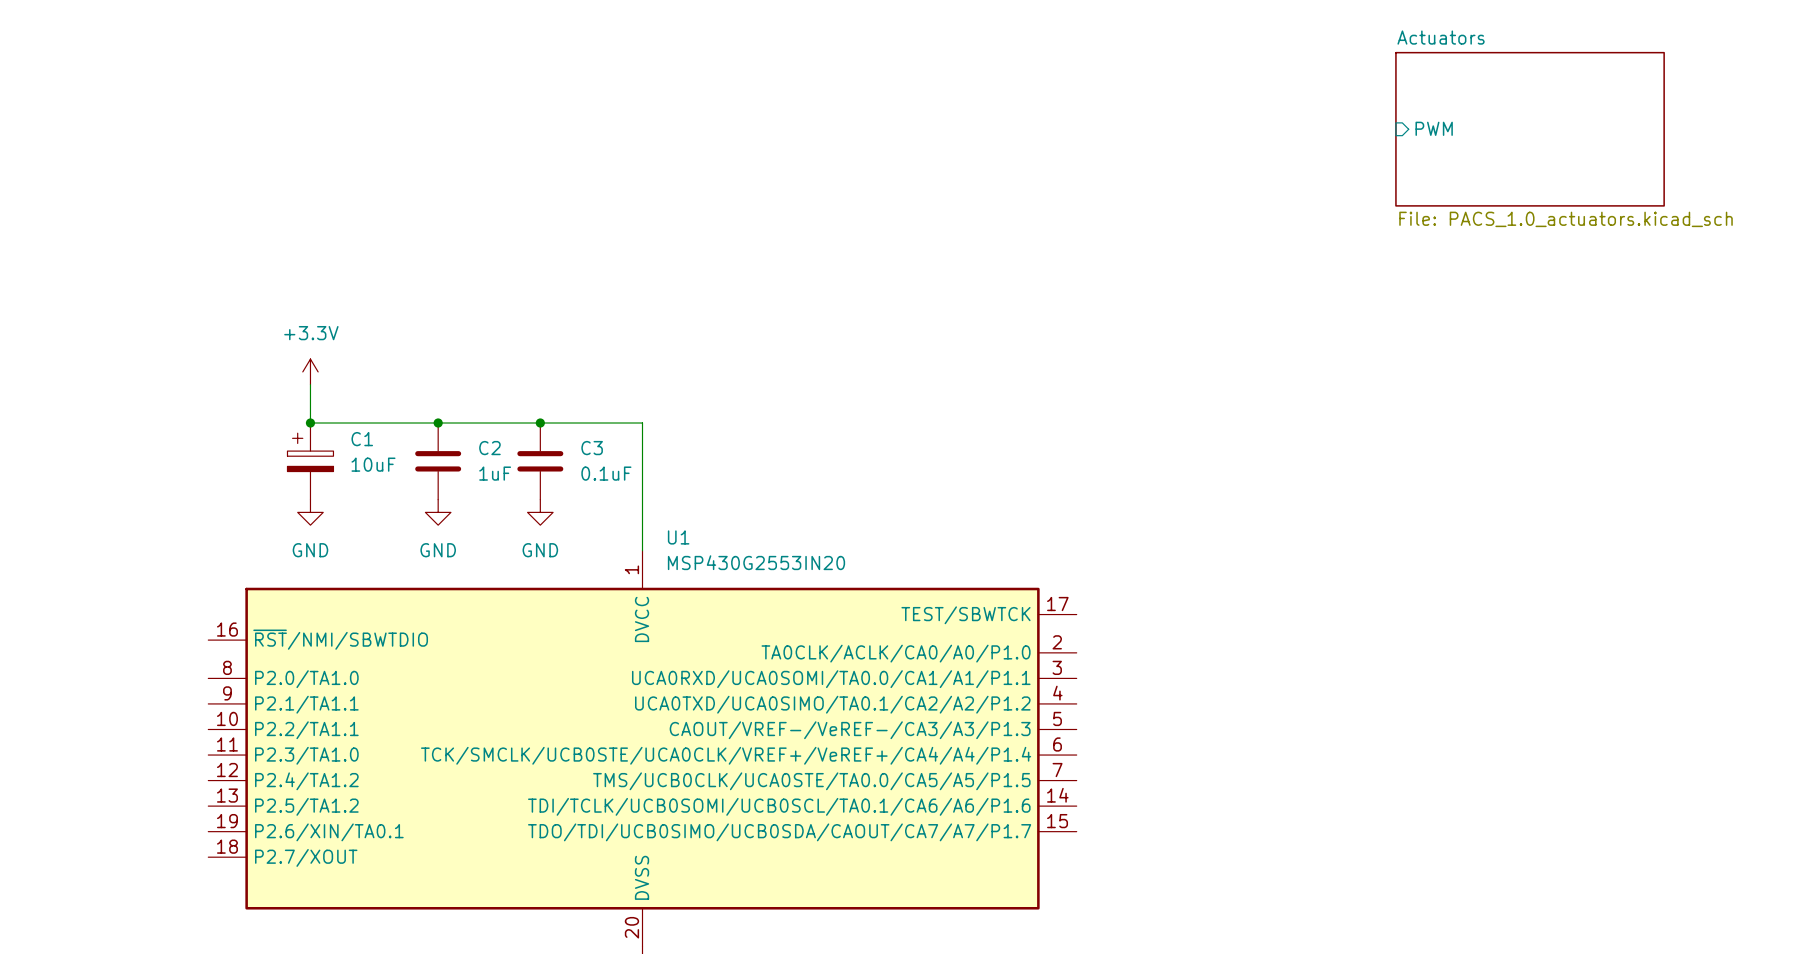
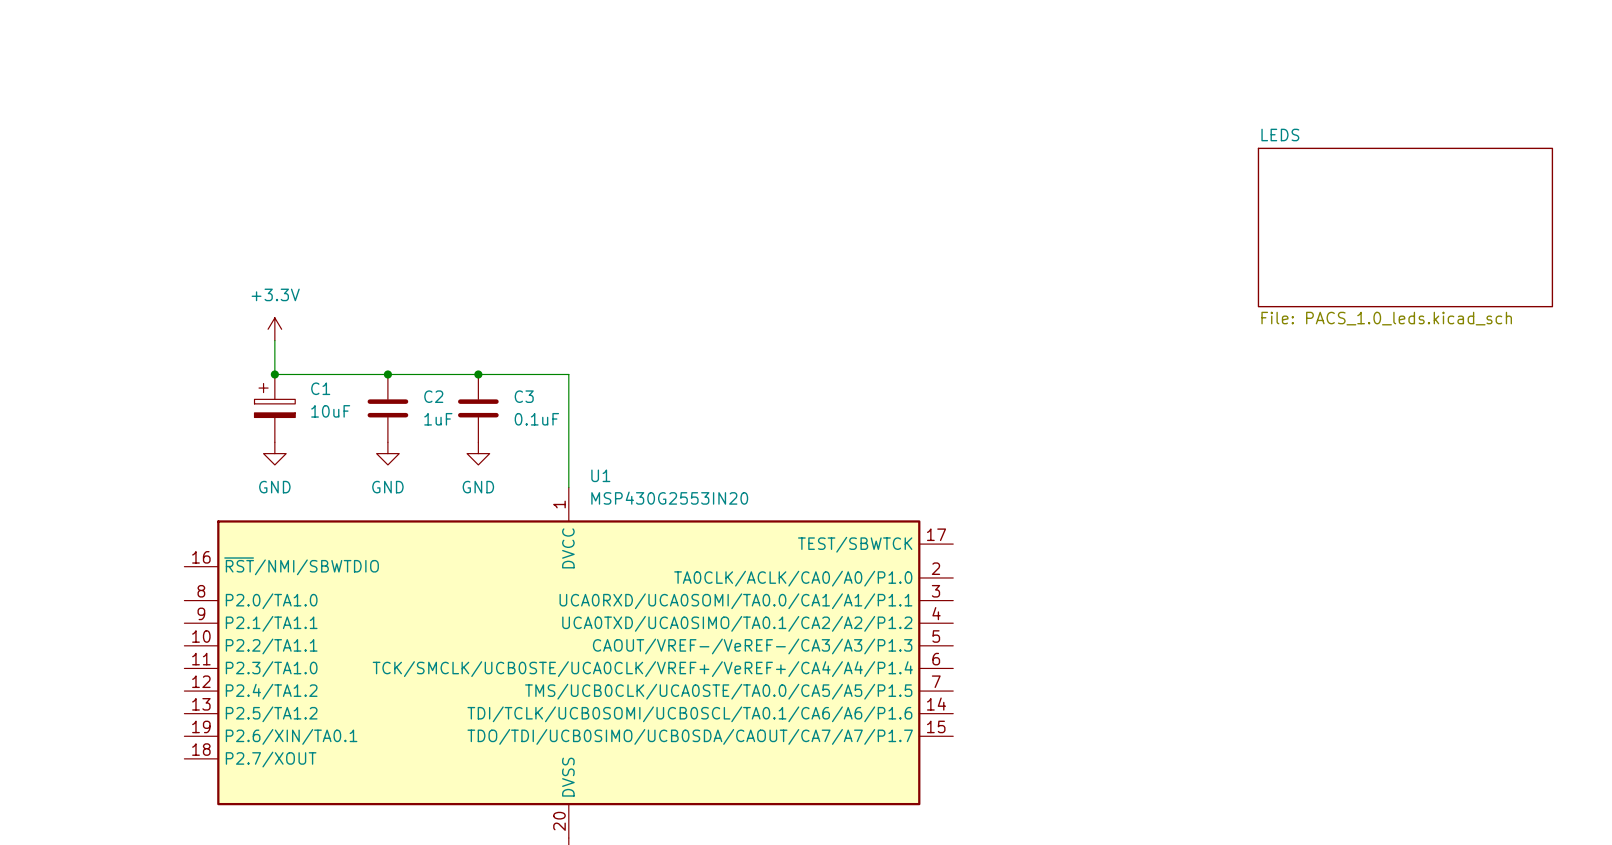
sheet pin: PWM (1434, 128) -> none
sheet Actuators: File: PACS_1.0_actuators.kicad_sch (1530, 129) -> none
sheet LEDS: none -> File: PACS_1.0_leds.kicad_sch (1405, 227)

